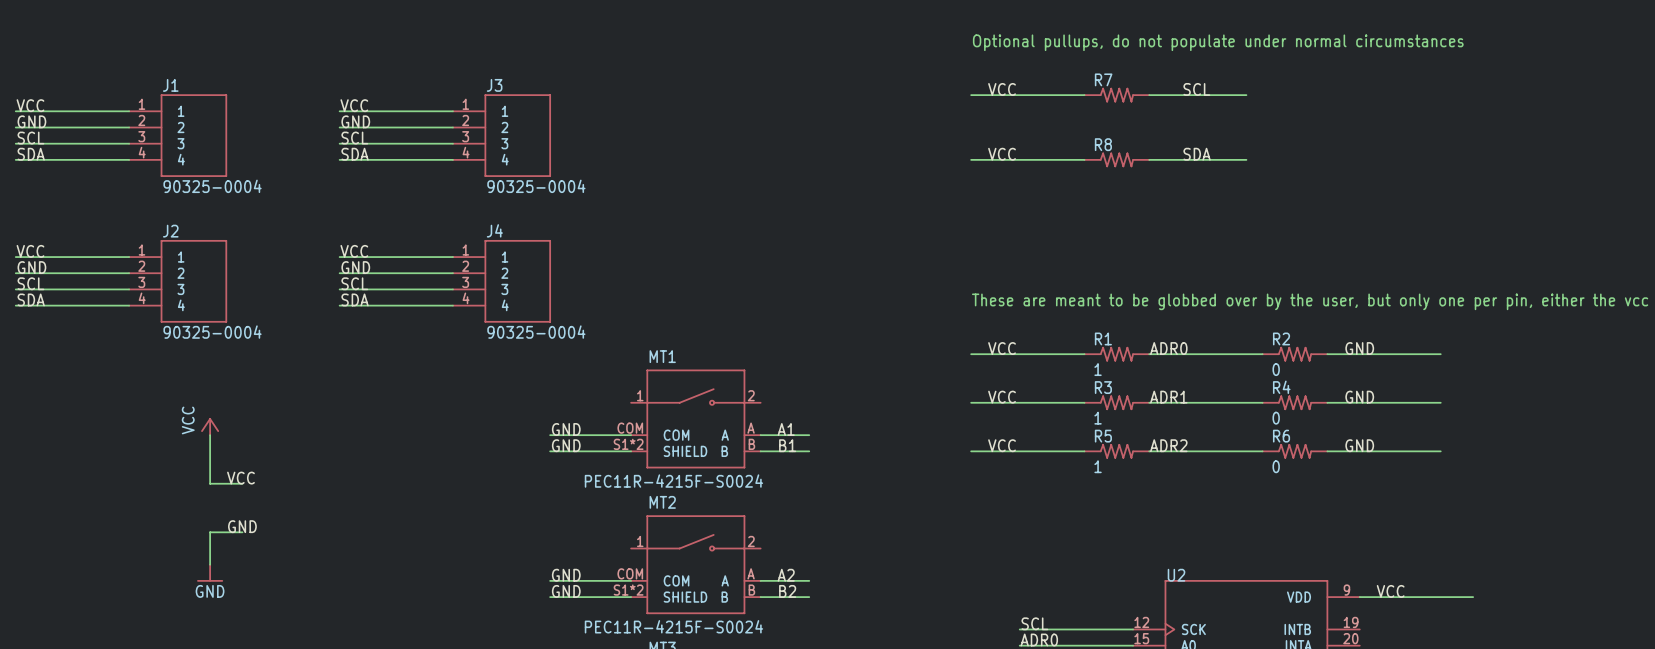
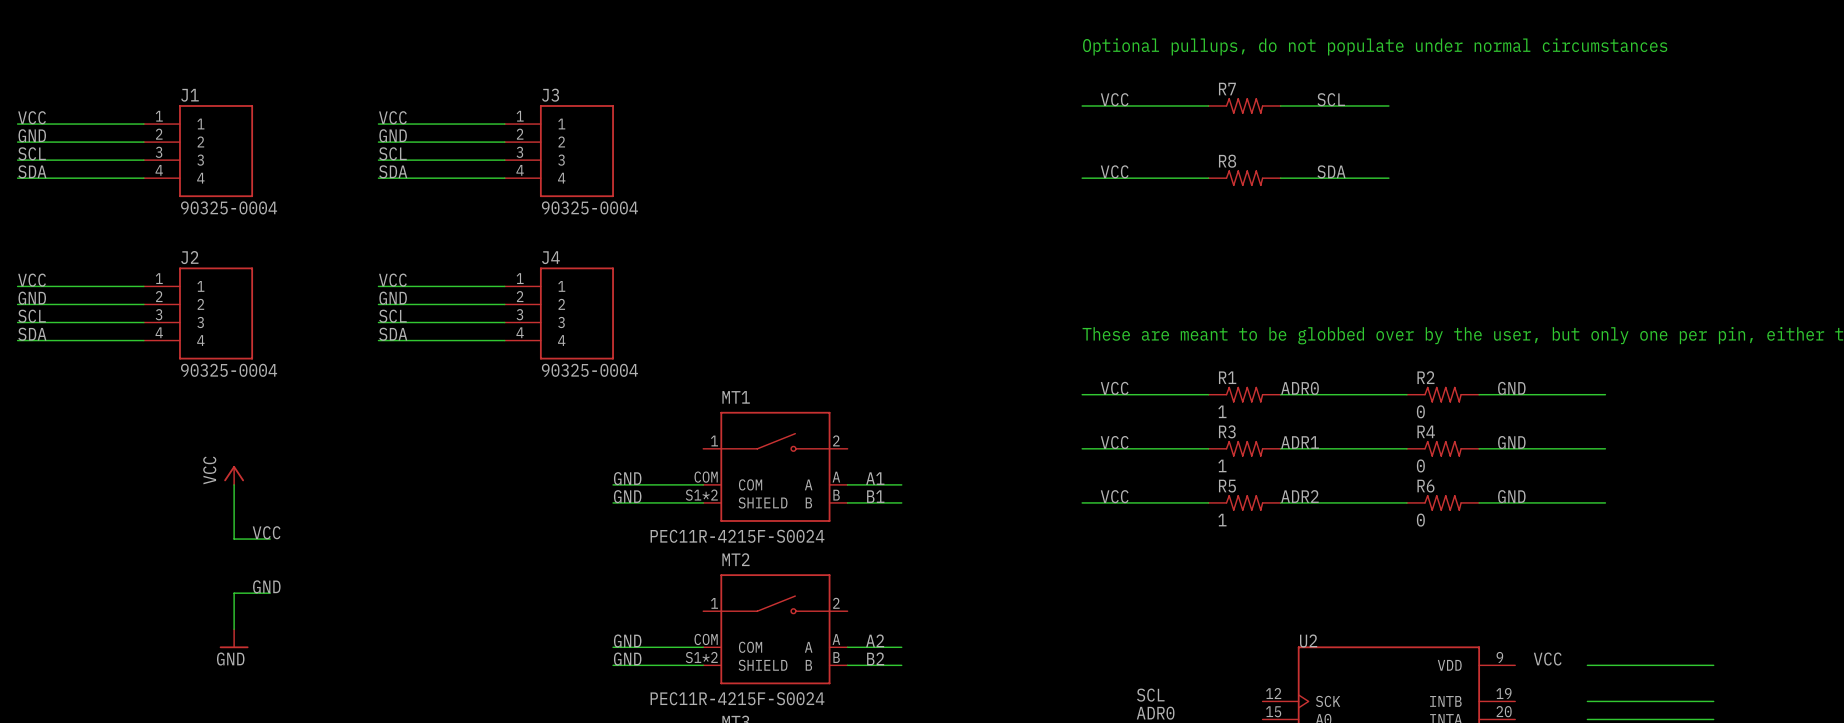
wire: (1359, 597) (1424, 597) -> (1641, 665) (1713, 665)
wire: (1019, 629) (1133, 629) -> none
wire: none -> (1587, 701) (1713, 701)
wire: (1019, 645) (1133, 645) -> none
wire: none -> (1587, 719) (1713, 719)

